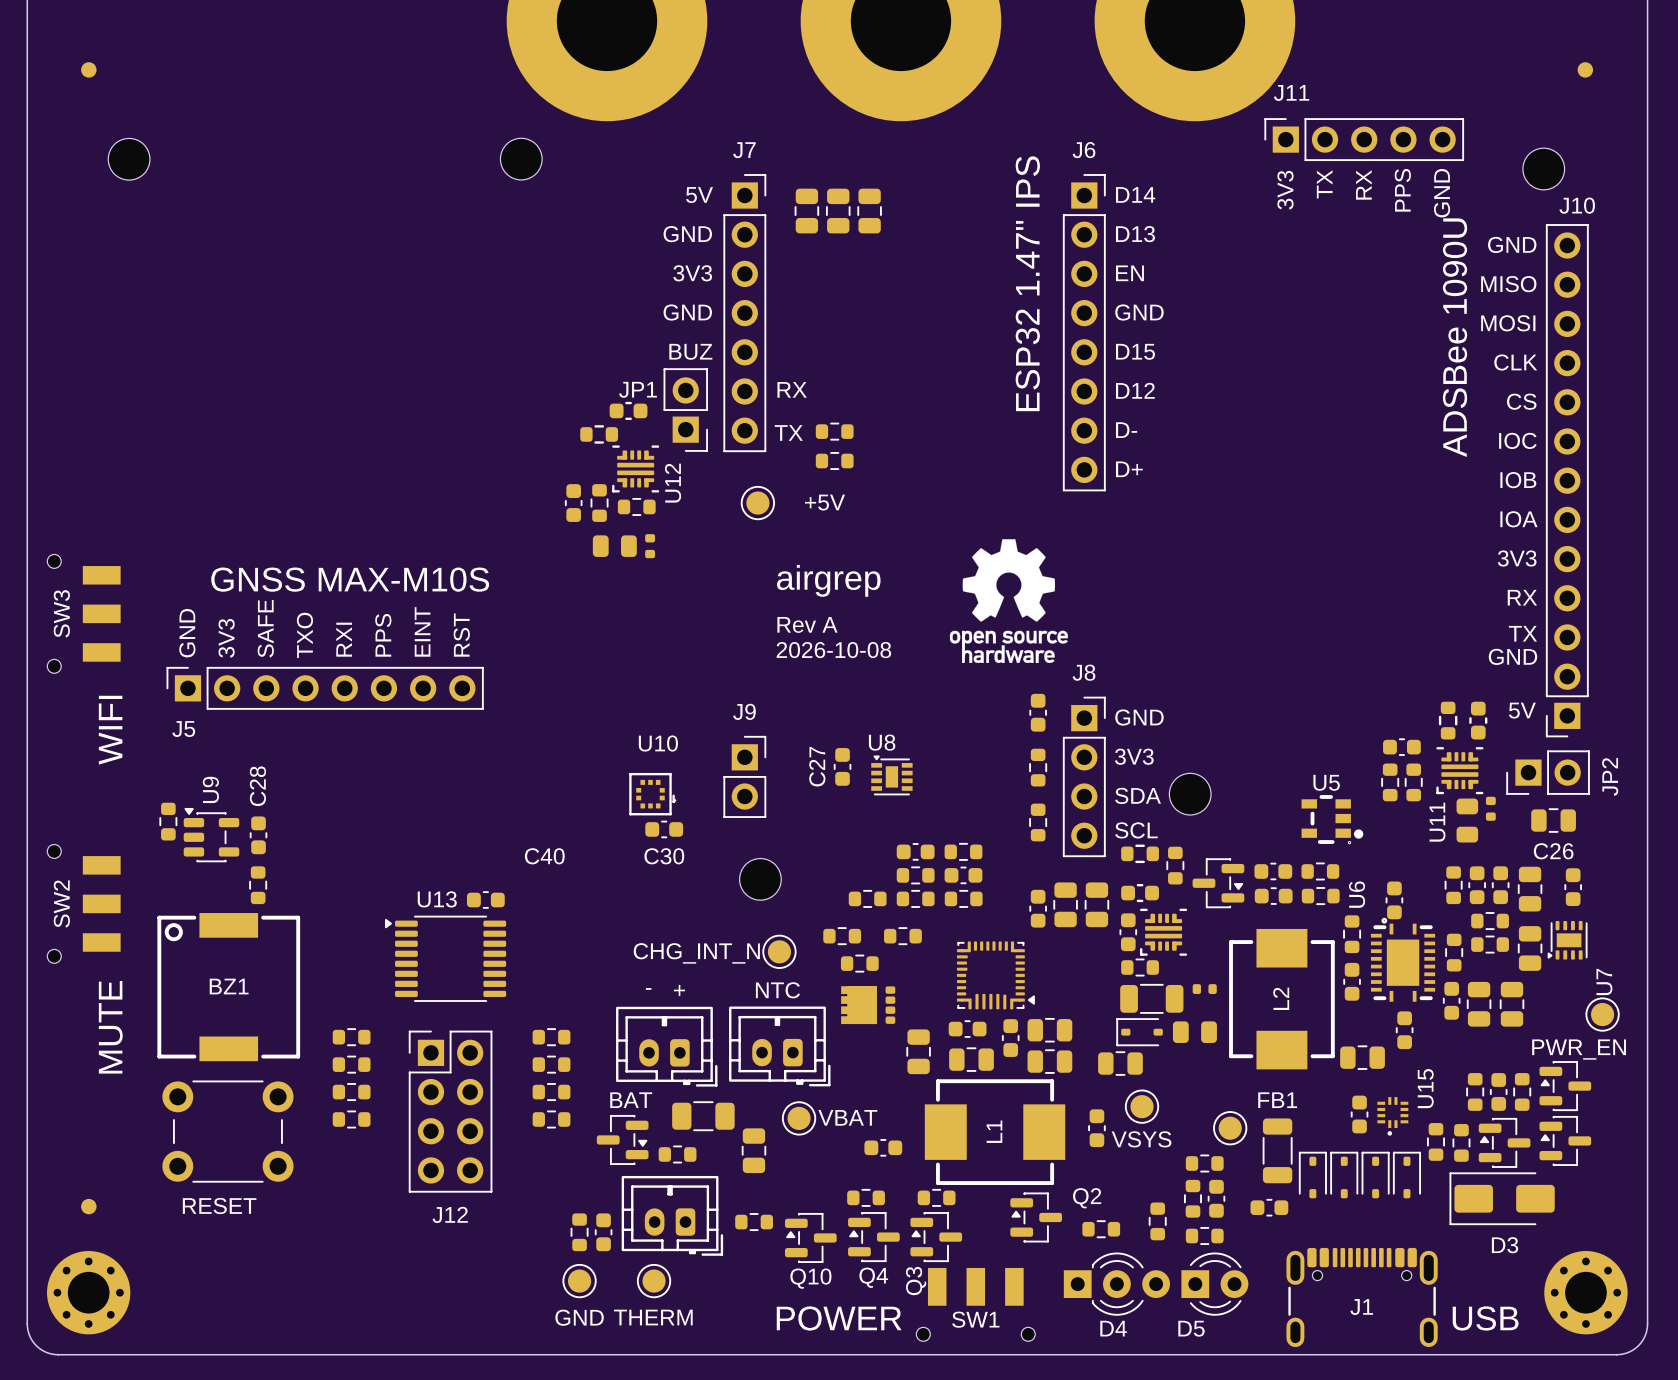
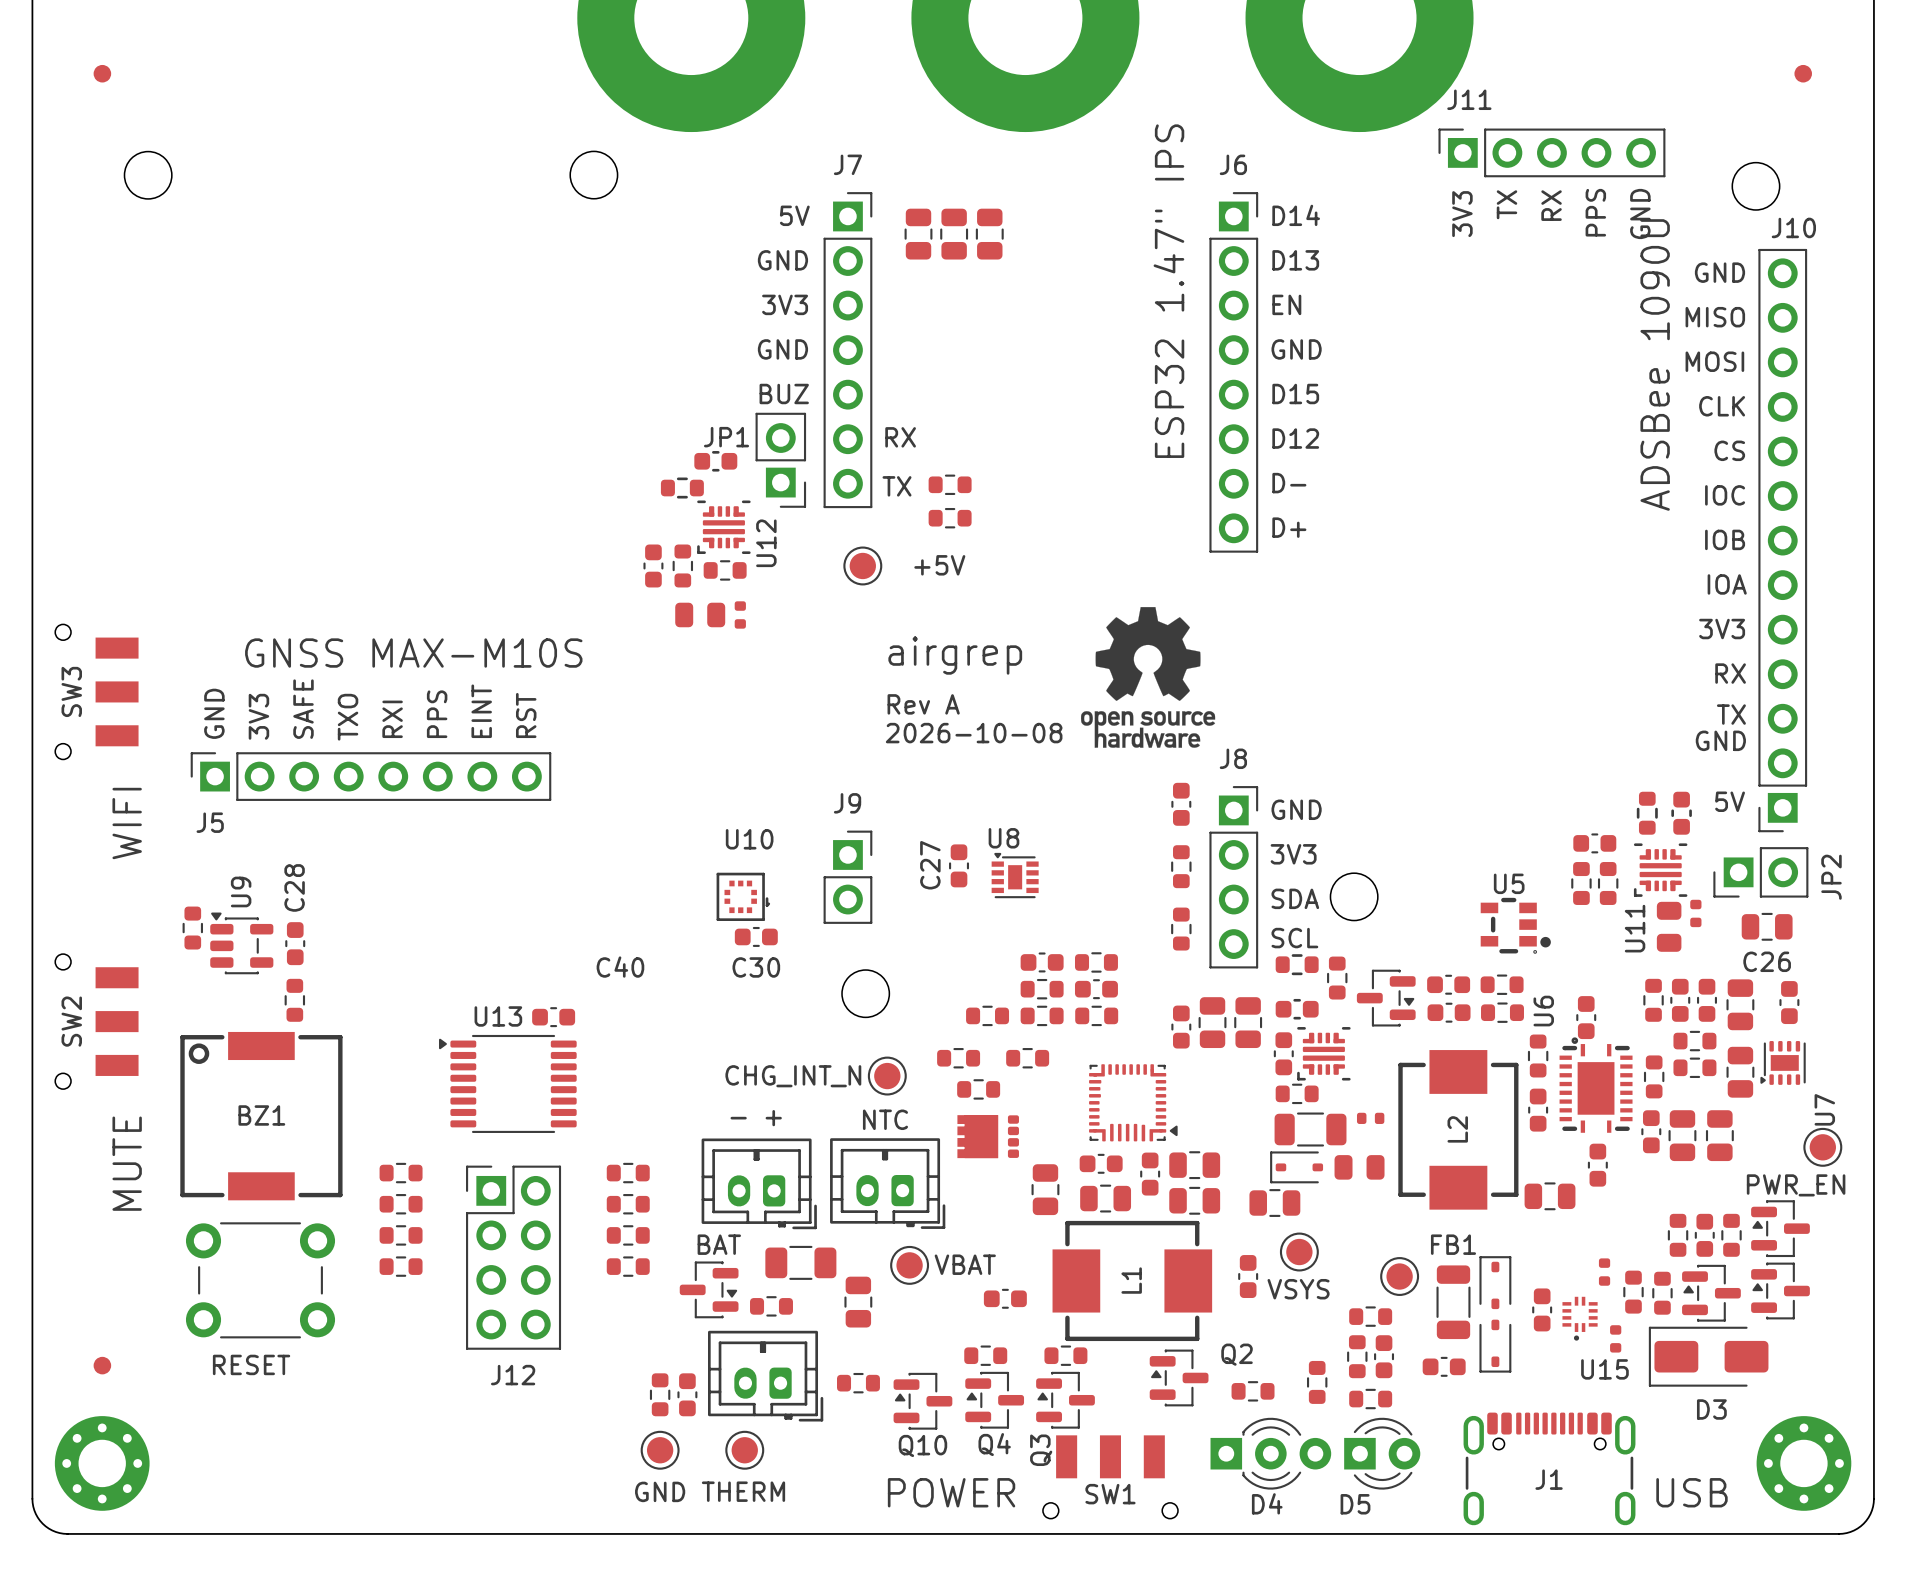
U15 name rotation: 0° (1425, 1088) -> 90° clockwise (1604, 1369)
U15 name position: U15 (1425, 1088) -> U15 (1604, 1369)
part position: (1359, 1114) -> (1542, 1309)
U15 position: (1392, 1116) -> (1580, 1318)
part: none -> (1604, 1272)
part: none -> (1495, 1282)
part rotation: 0° (1312, 1175) -> 180° (1495, 1346)
part: (1344, 1175) -> none
part: (1375, 1175) -> none
part: (1406, 1175) -> none
part: none -> (1615, 1338)

